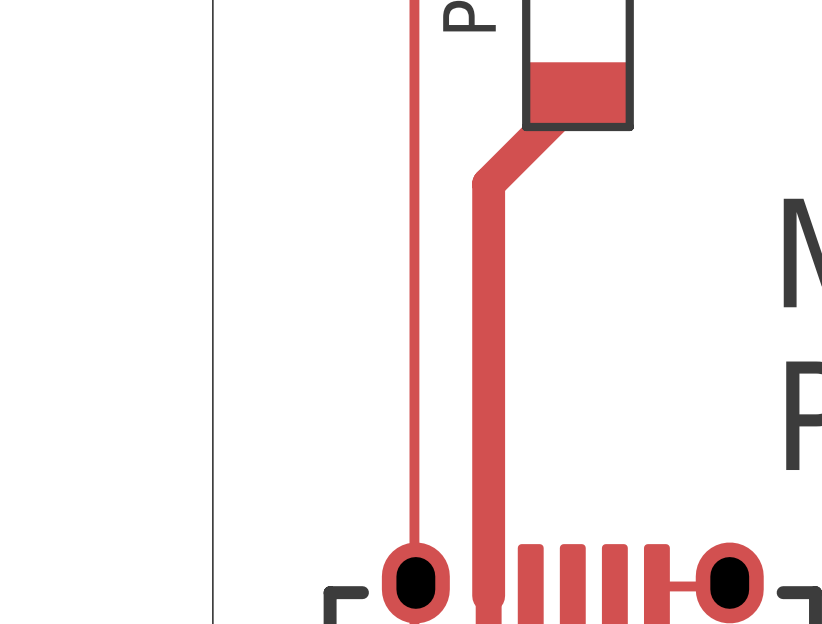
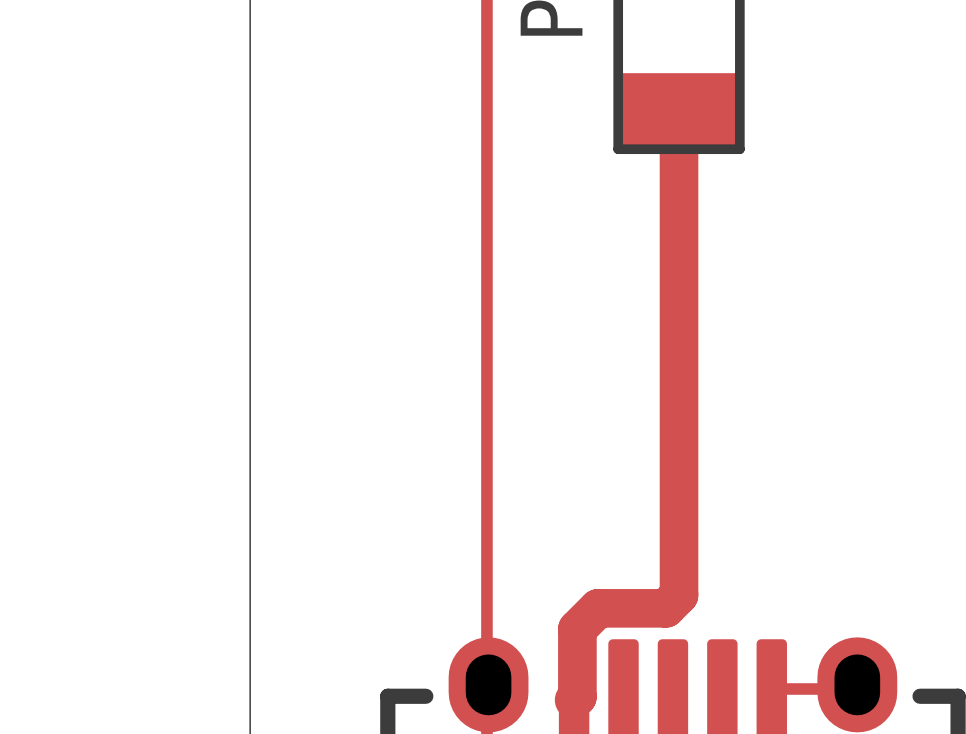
track: (577, 94) (488, 183) (488, 595) -> (679, 111) (679, 595) (665, 608) (598, 608) (577, 629) (577, 696) (574, 700)

